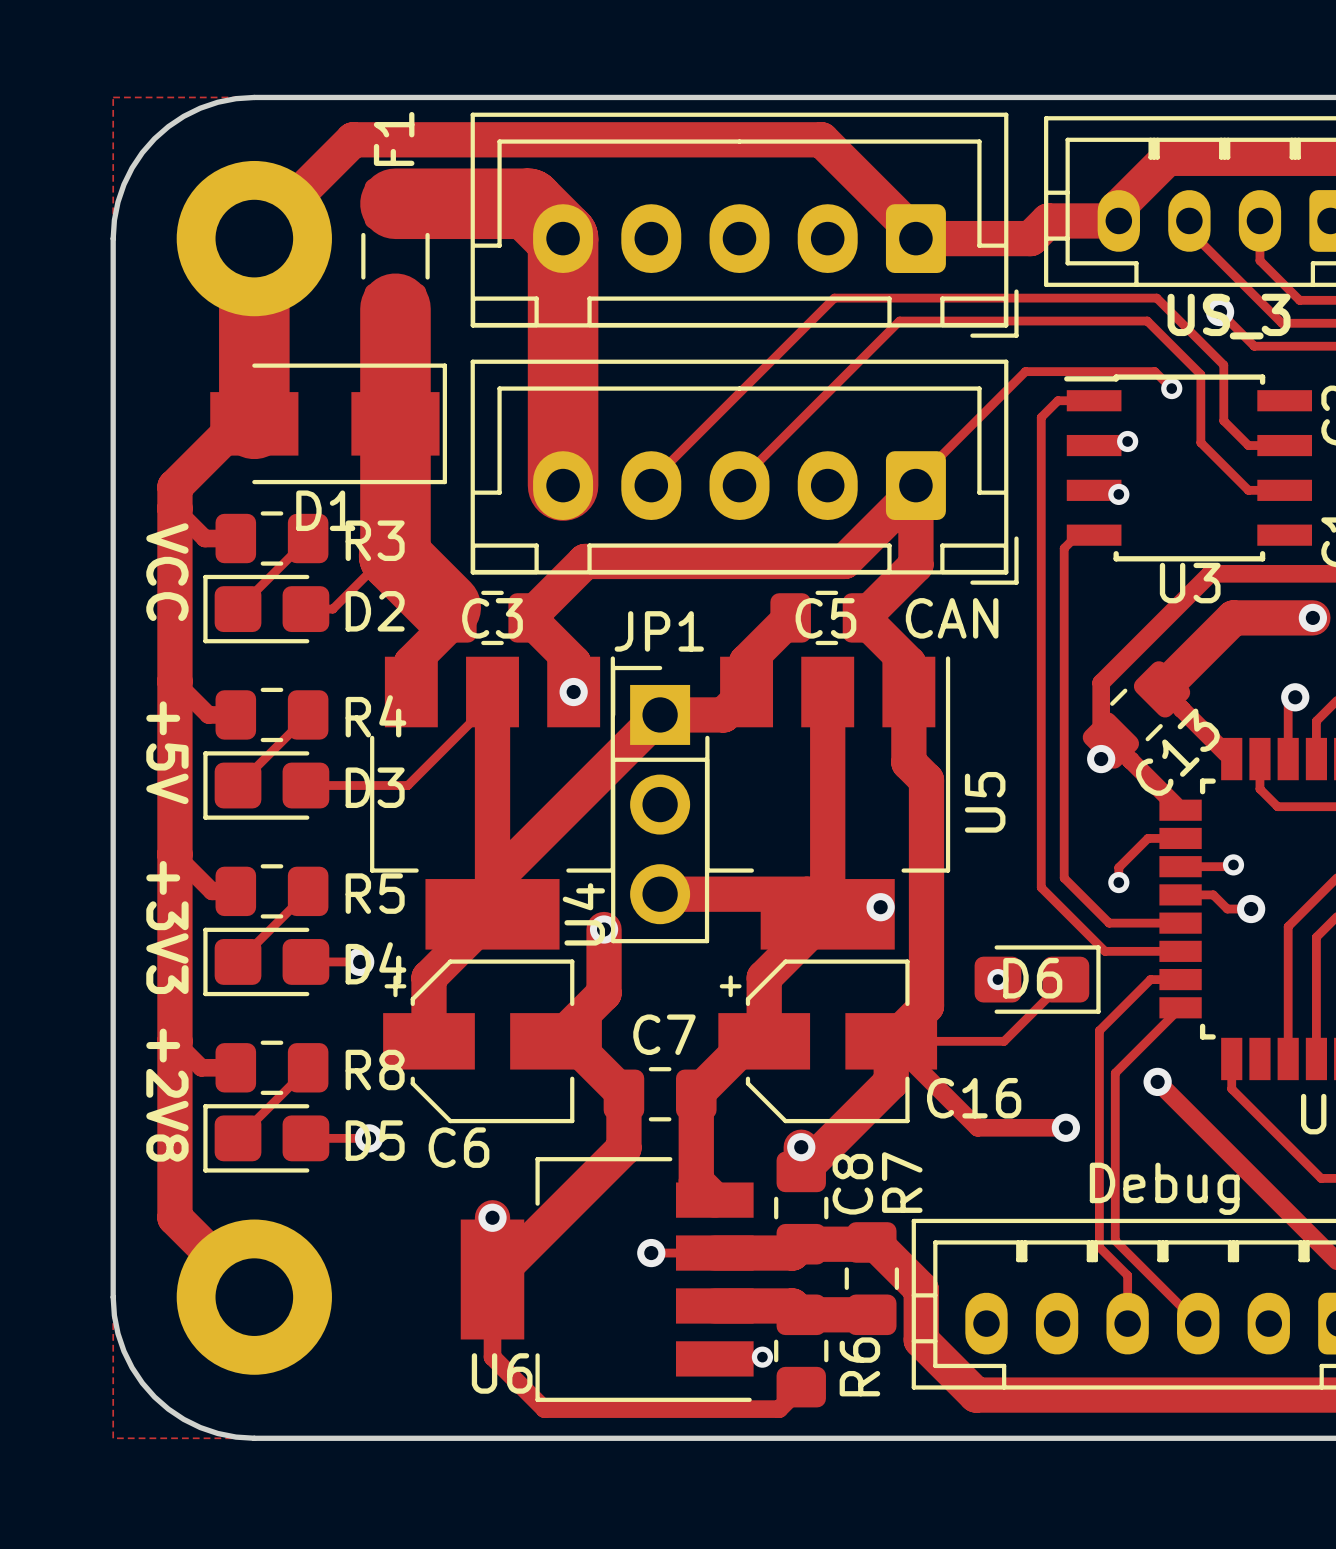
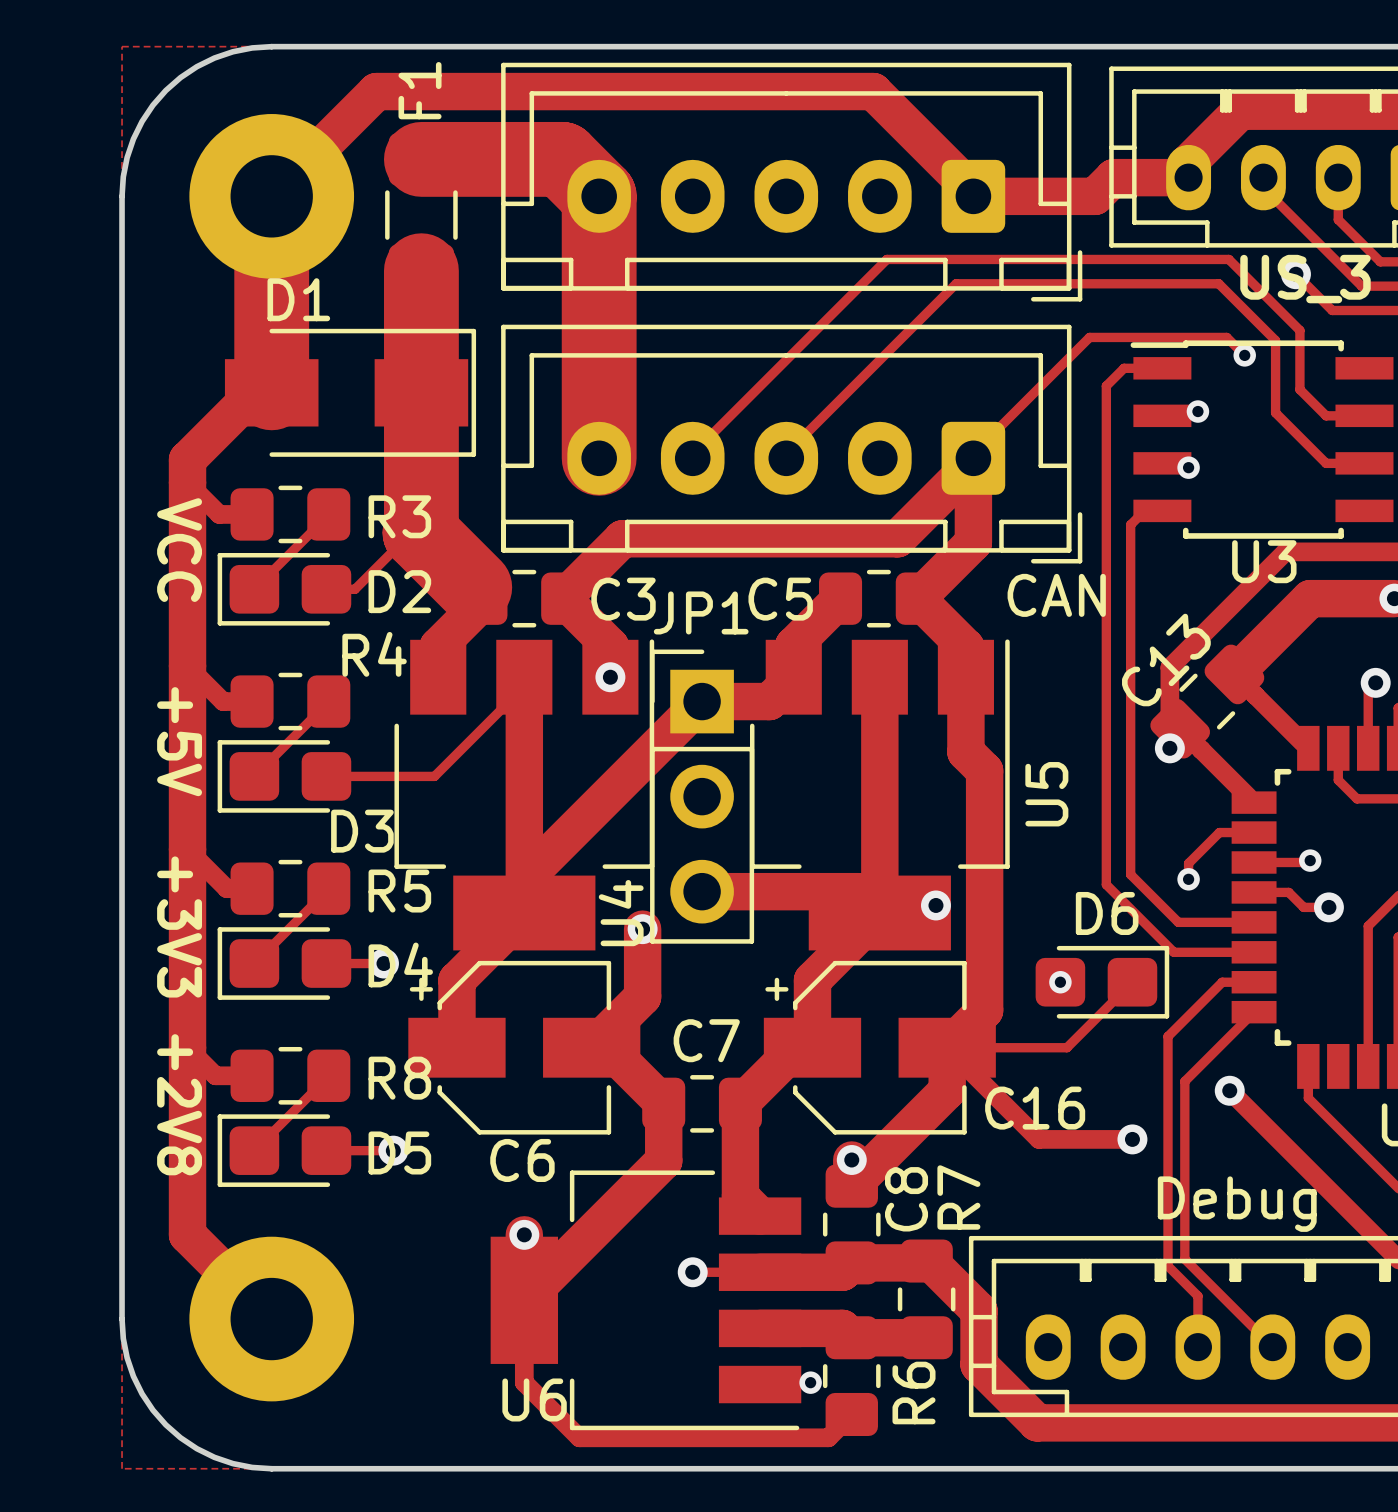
D1 name position: D1 (325, 510) -> D1 (298, 299)
C3 name position: C3 (492, 618) -> C3 (623, 599)
C5 name position: C5 (825, 618) -> C5 (780, 599)
text position: CAN (952, 618) -> CAN (1056, 595)
R4 name position: R4 (375, 716) -> R4 (374, 654)
C13 name position: C13 (1177, 752) -> C13 (1166, 660)
D3 name position: D3 (375, 787) -> D3 (362, 831)
D6 name position: D6 (1032, 978) -> D6 (1107, 913)
C6 name position: C6 (458, 1147) -> C6 (522, 1160)

